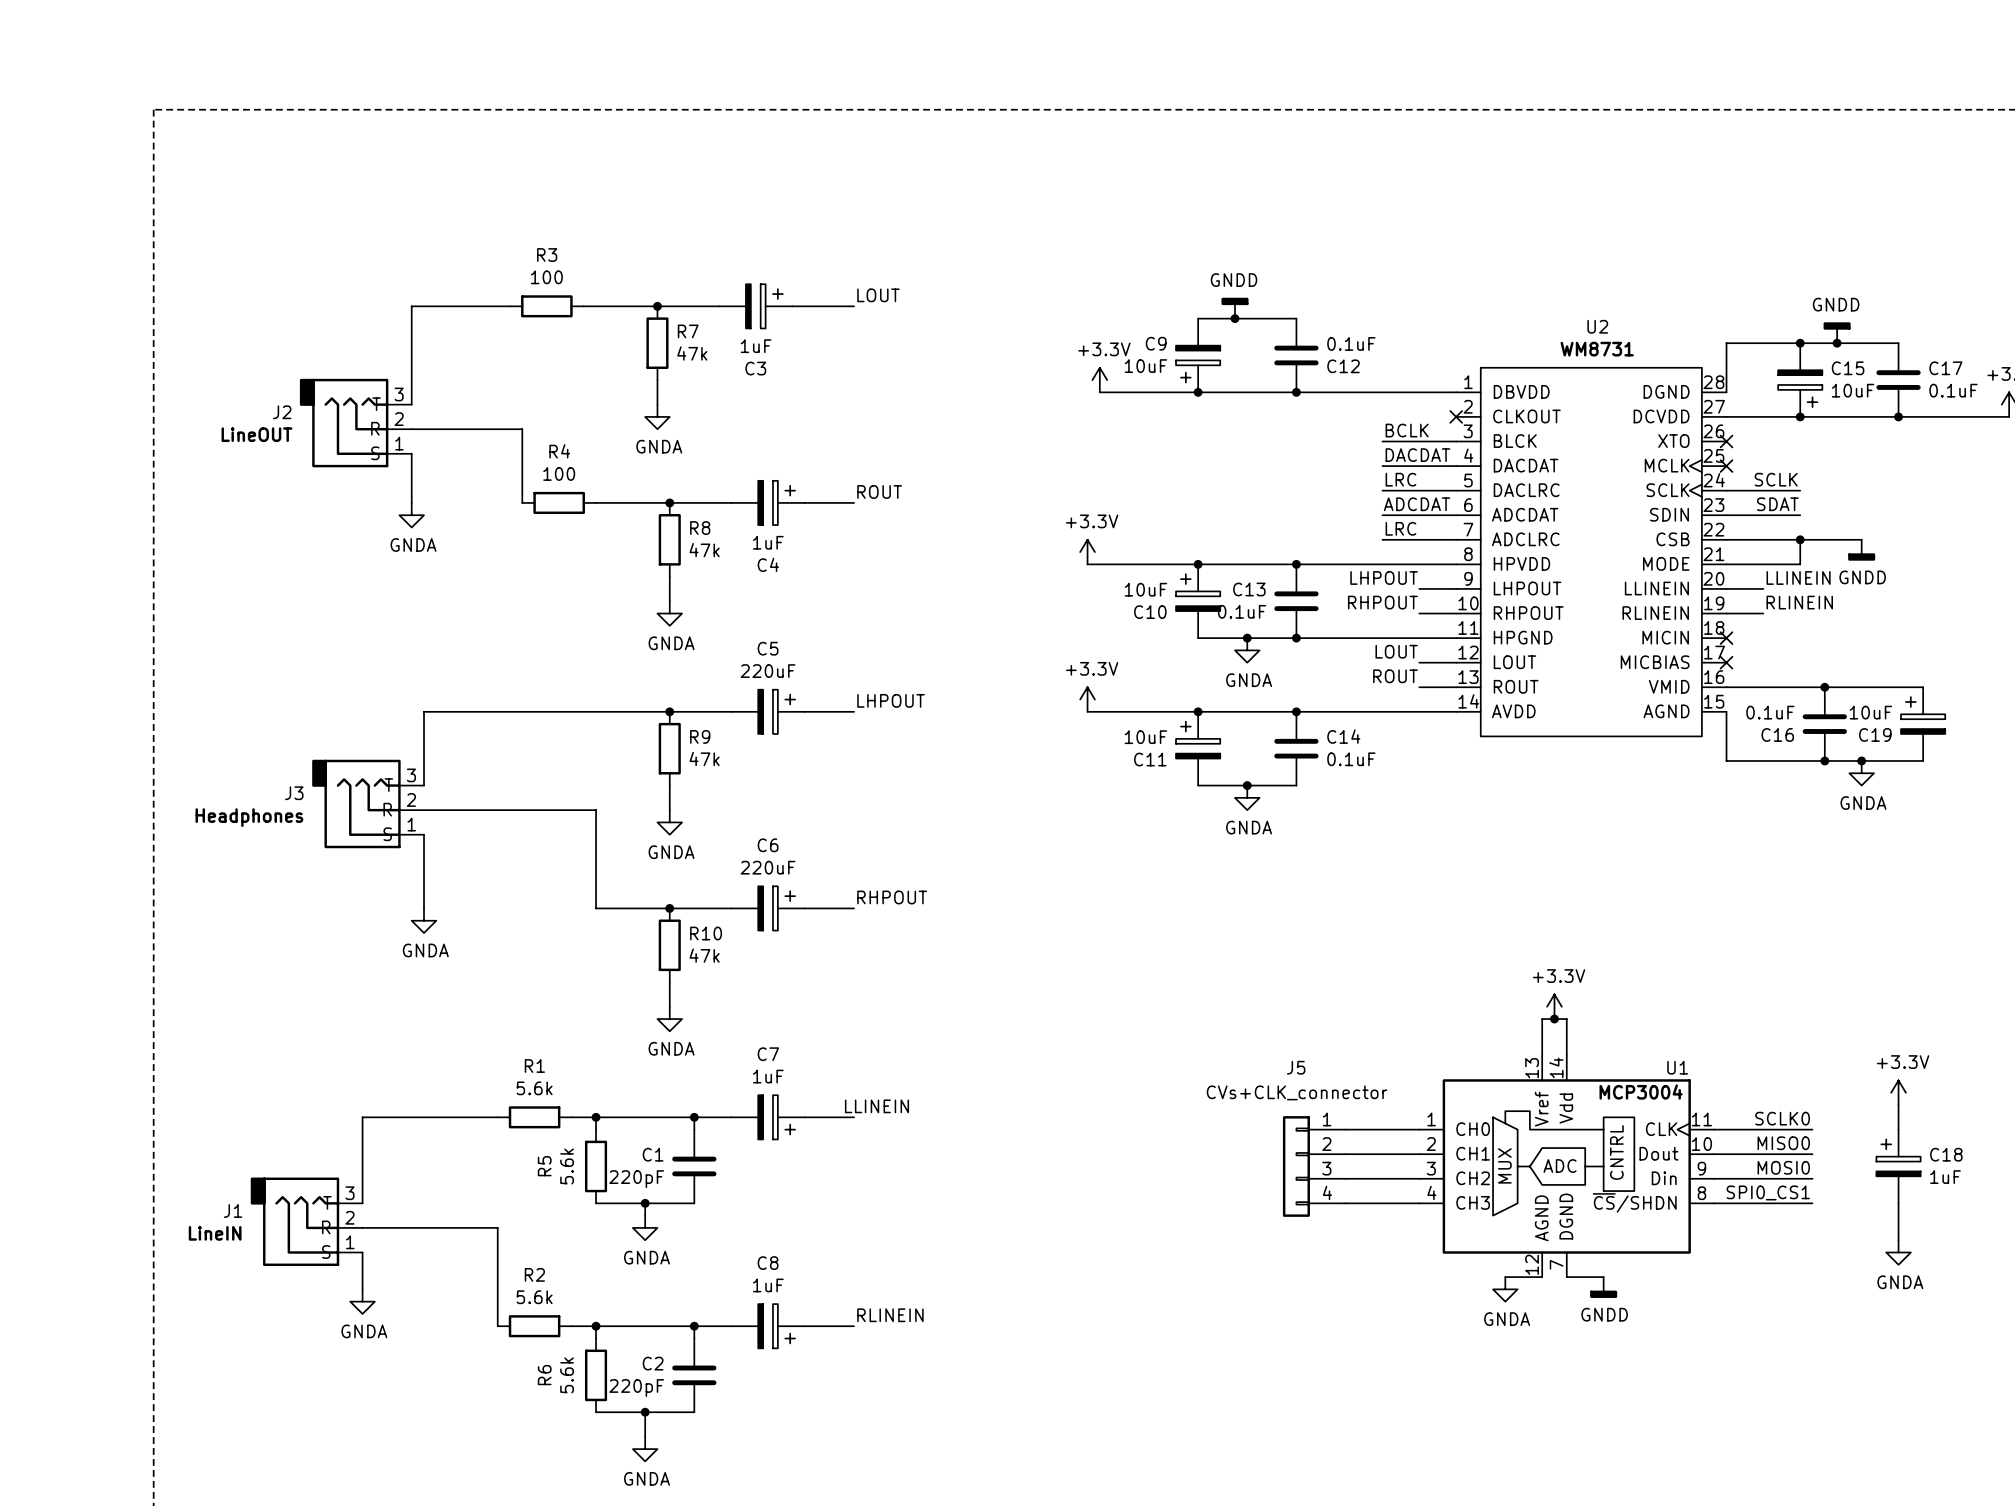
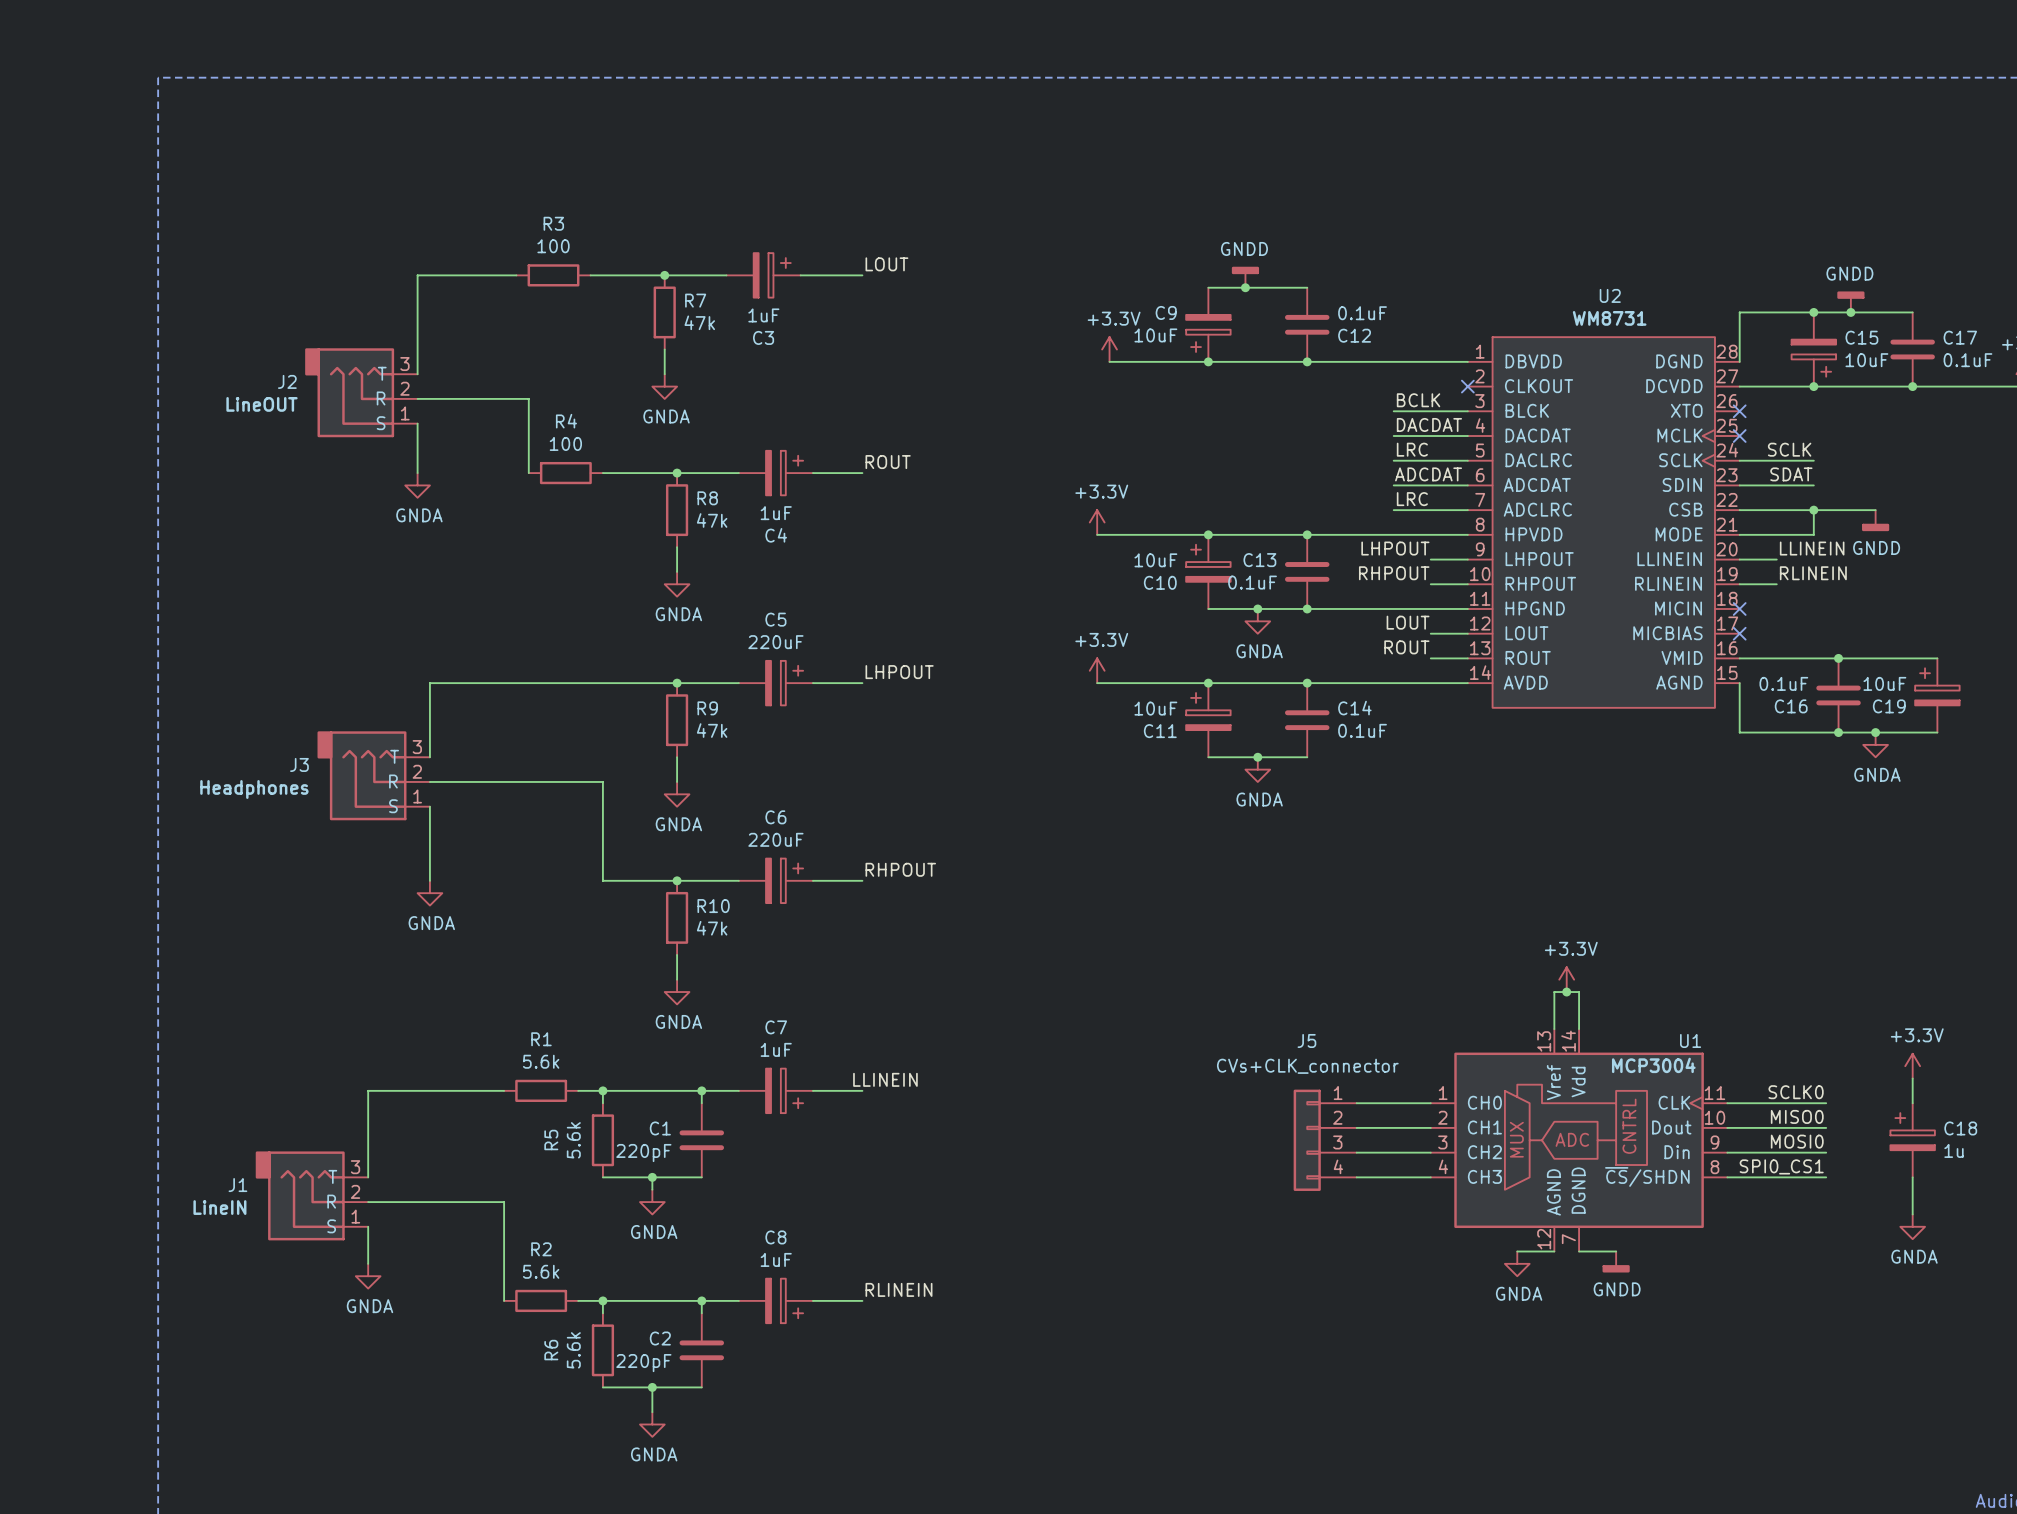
C18 value: 1uF (1945, 1177) -> 1u (1953, 1150)

